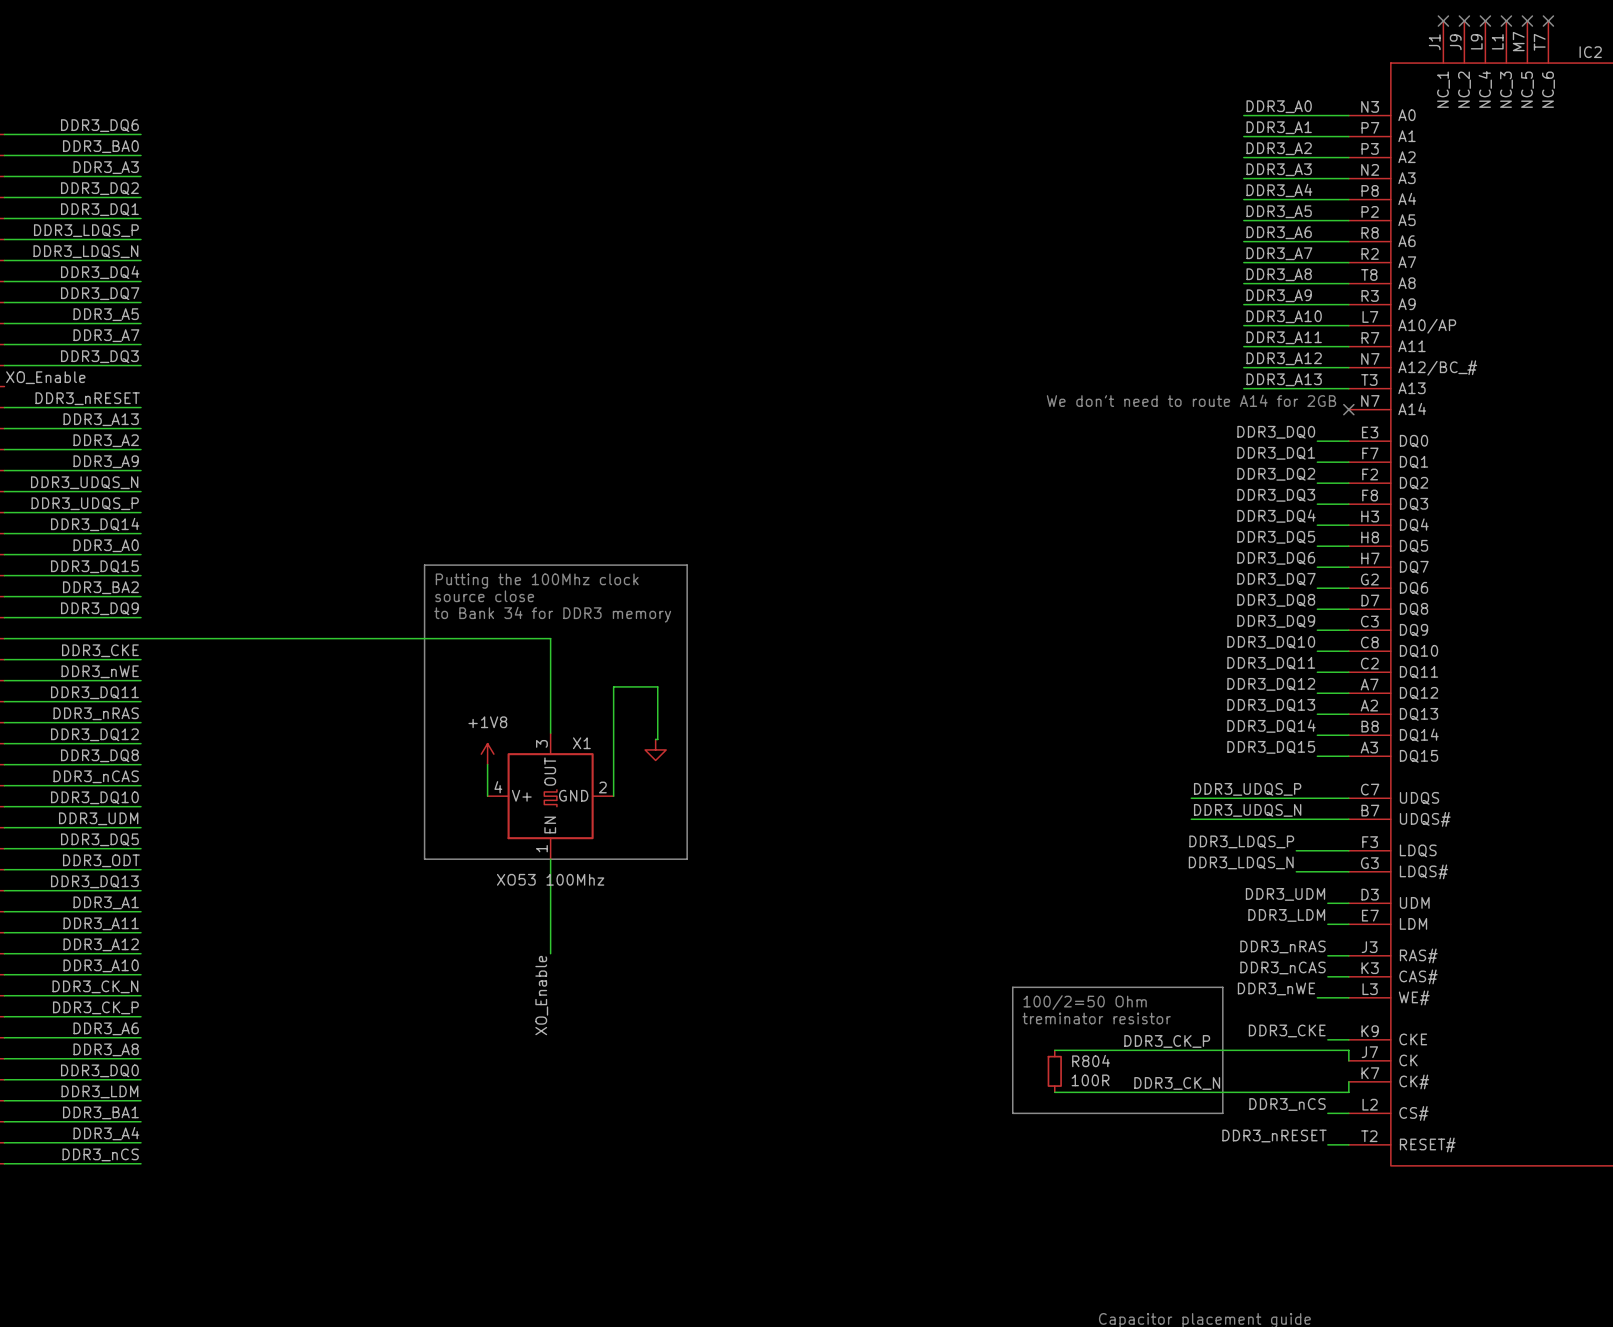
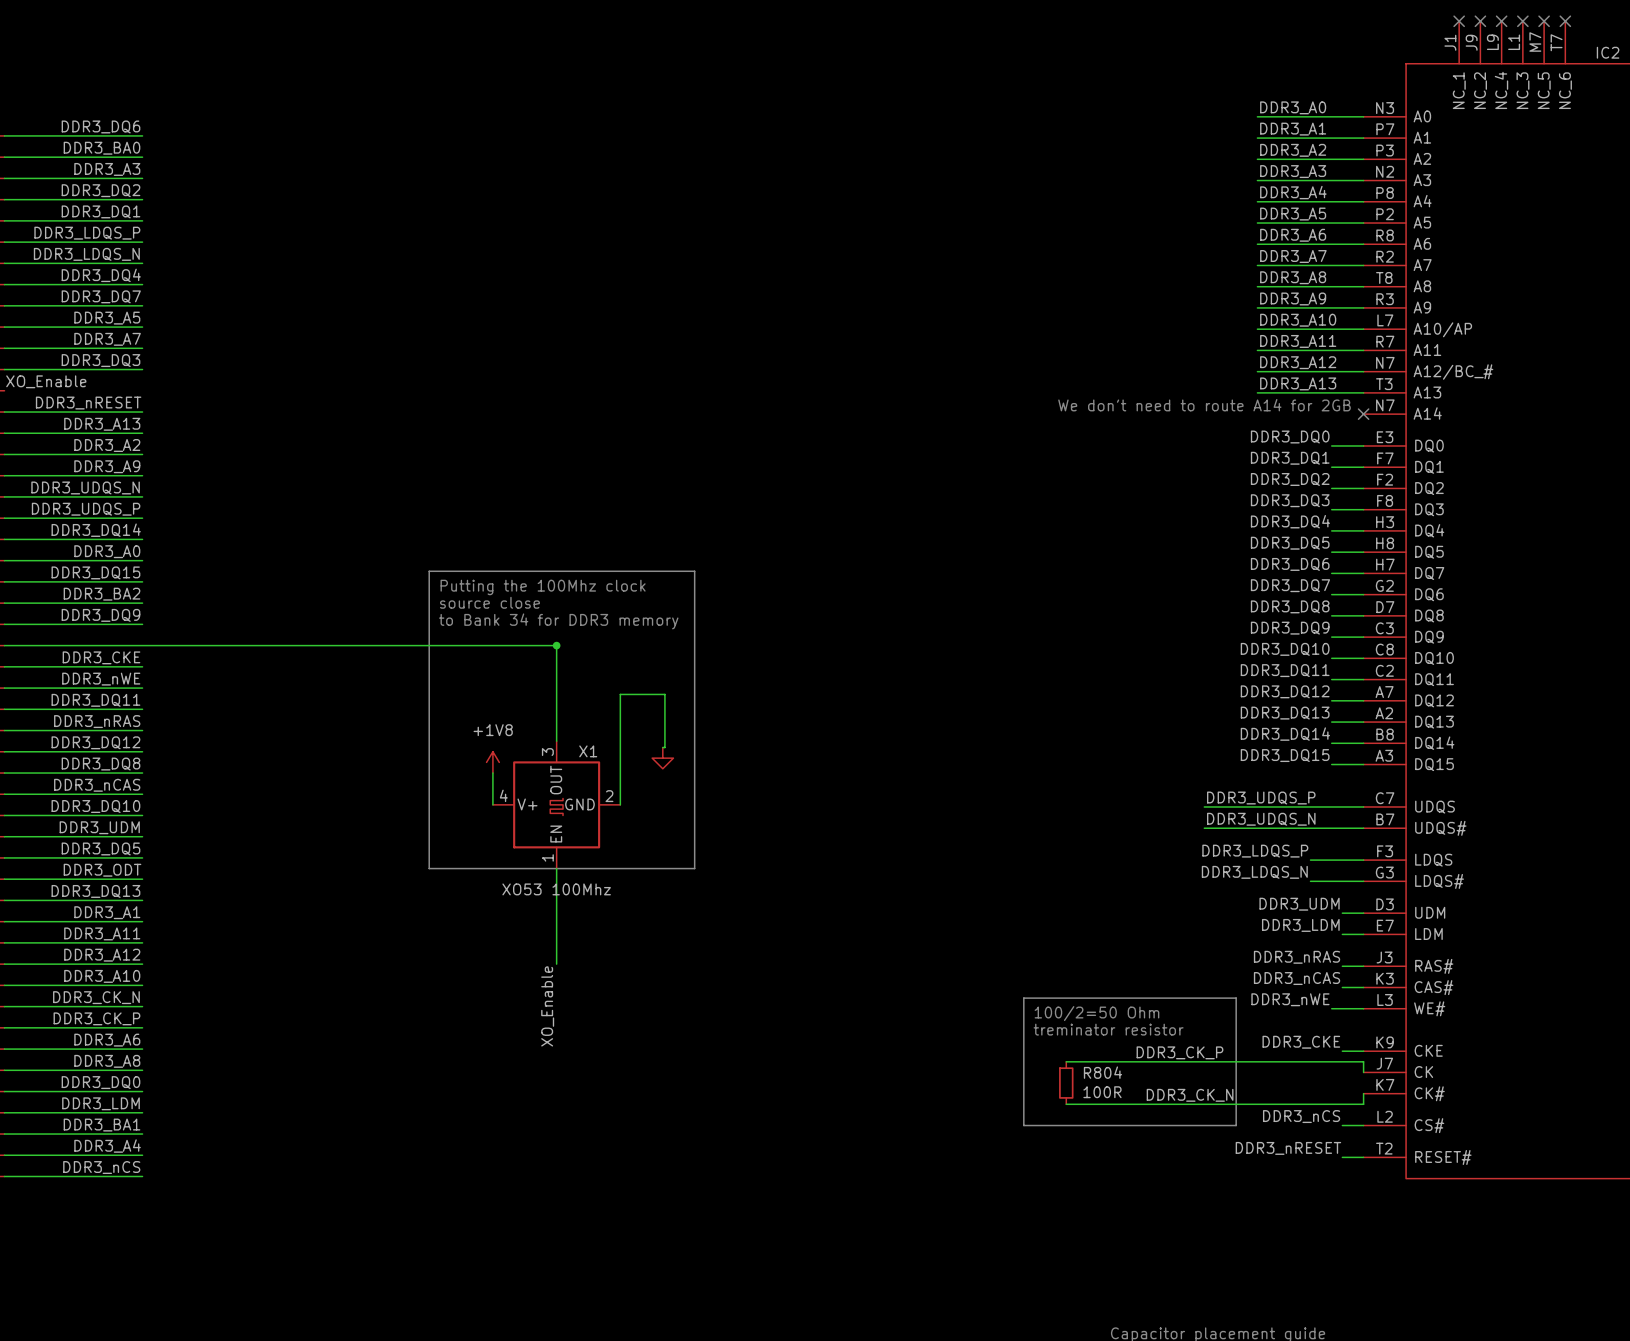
junction: none -> (556, 645)

